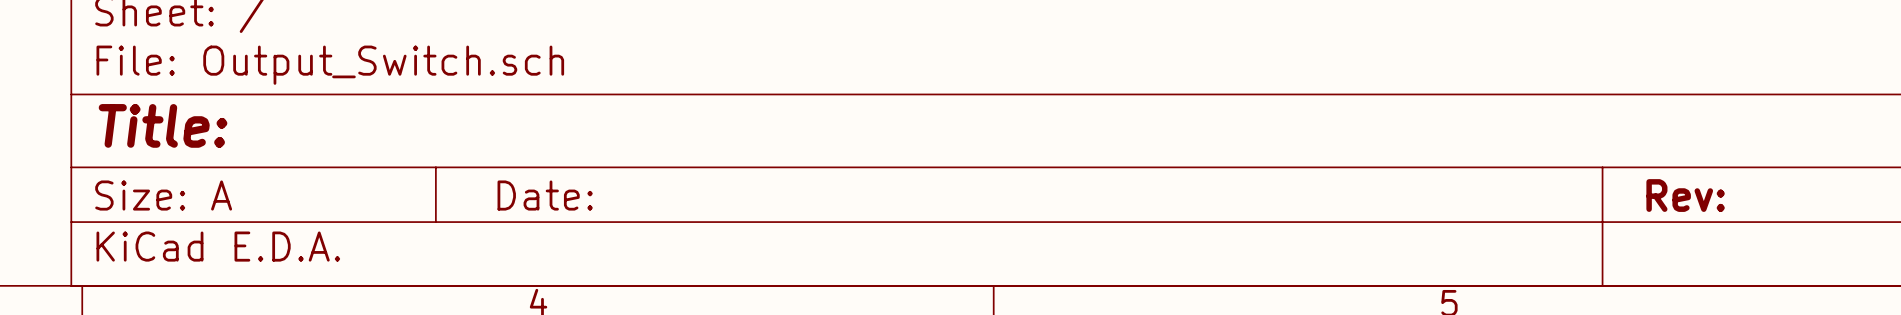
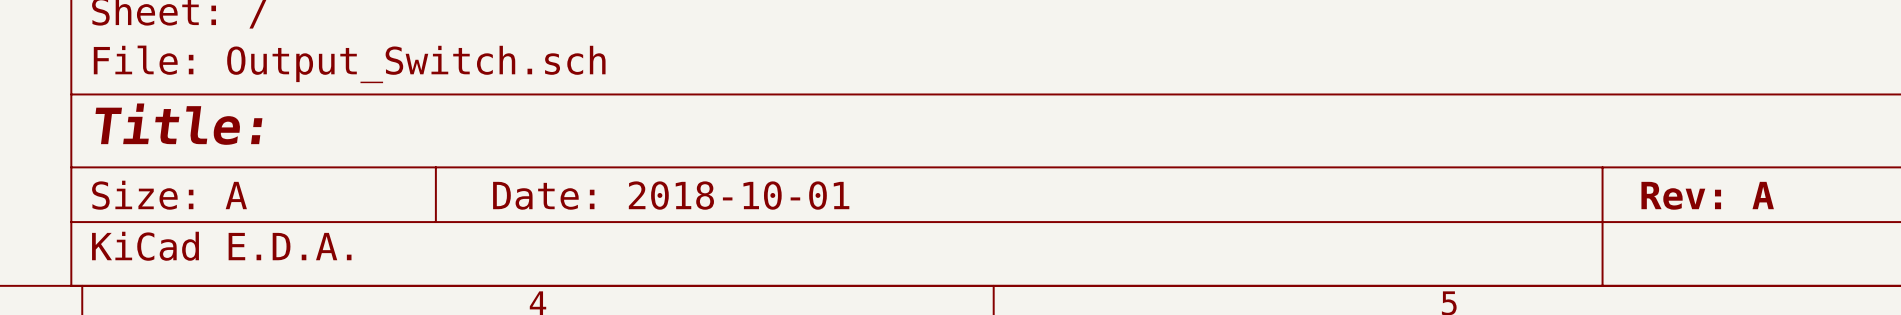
title block: Date: (545, 195) -> Date: 2018-10-01 (671, 195)
title block: Rev: (1685, 195) -> Rev: A (1707, 195)

